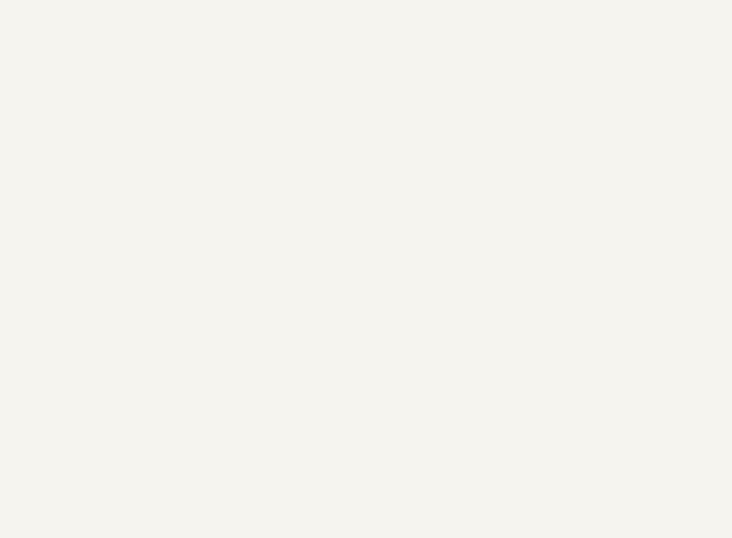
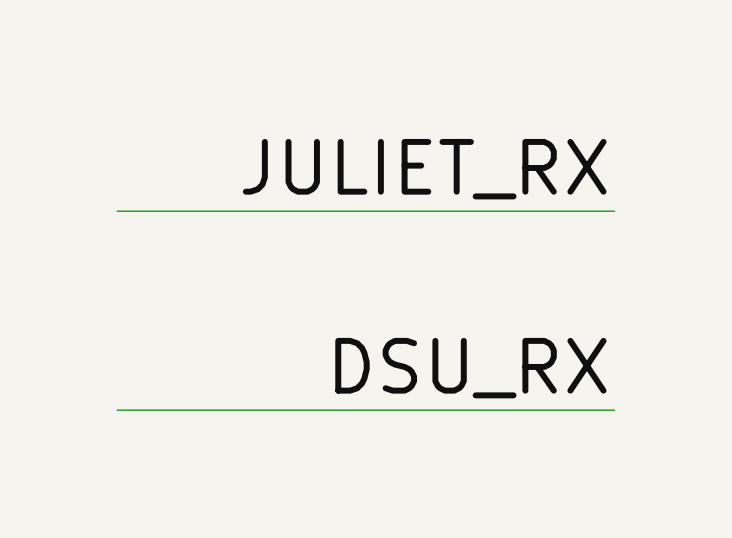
label: none -> JULIET_RX (424, 169)
wire: none -> (117, 211) (614, 211)
label: none -> DSU_RX (470, 368)
wire: none -> (117, 410) (614, 410)

